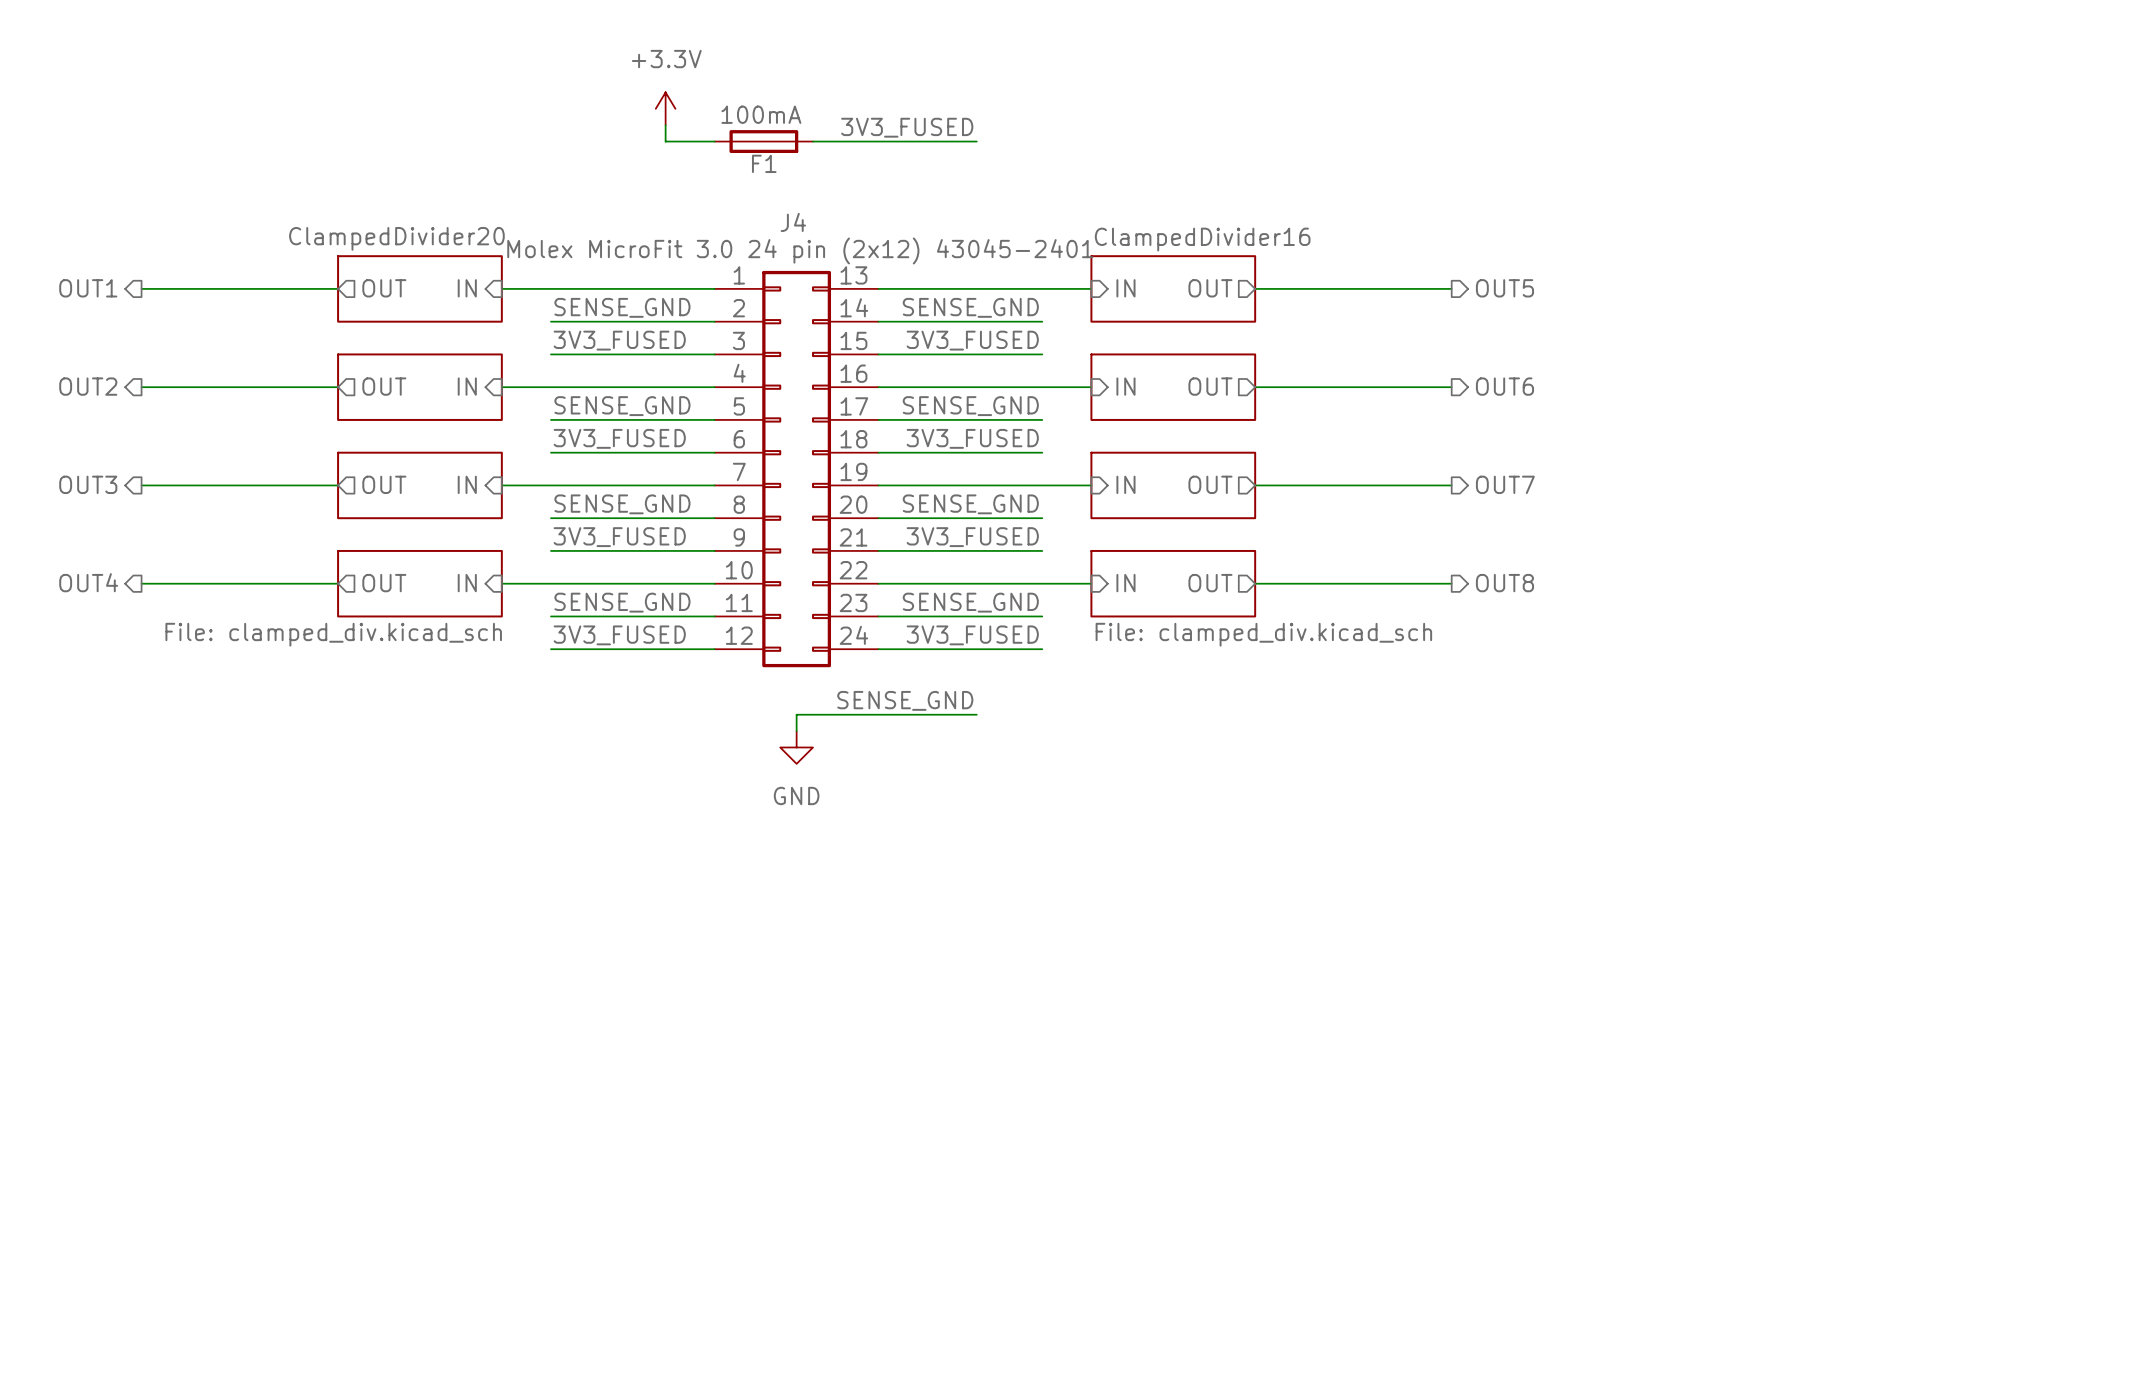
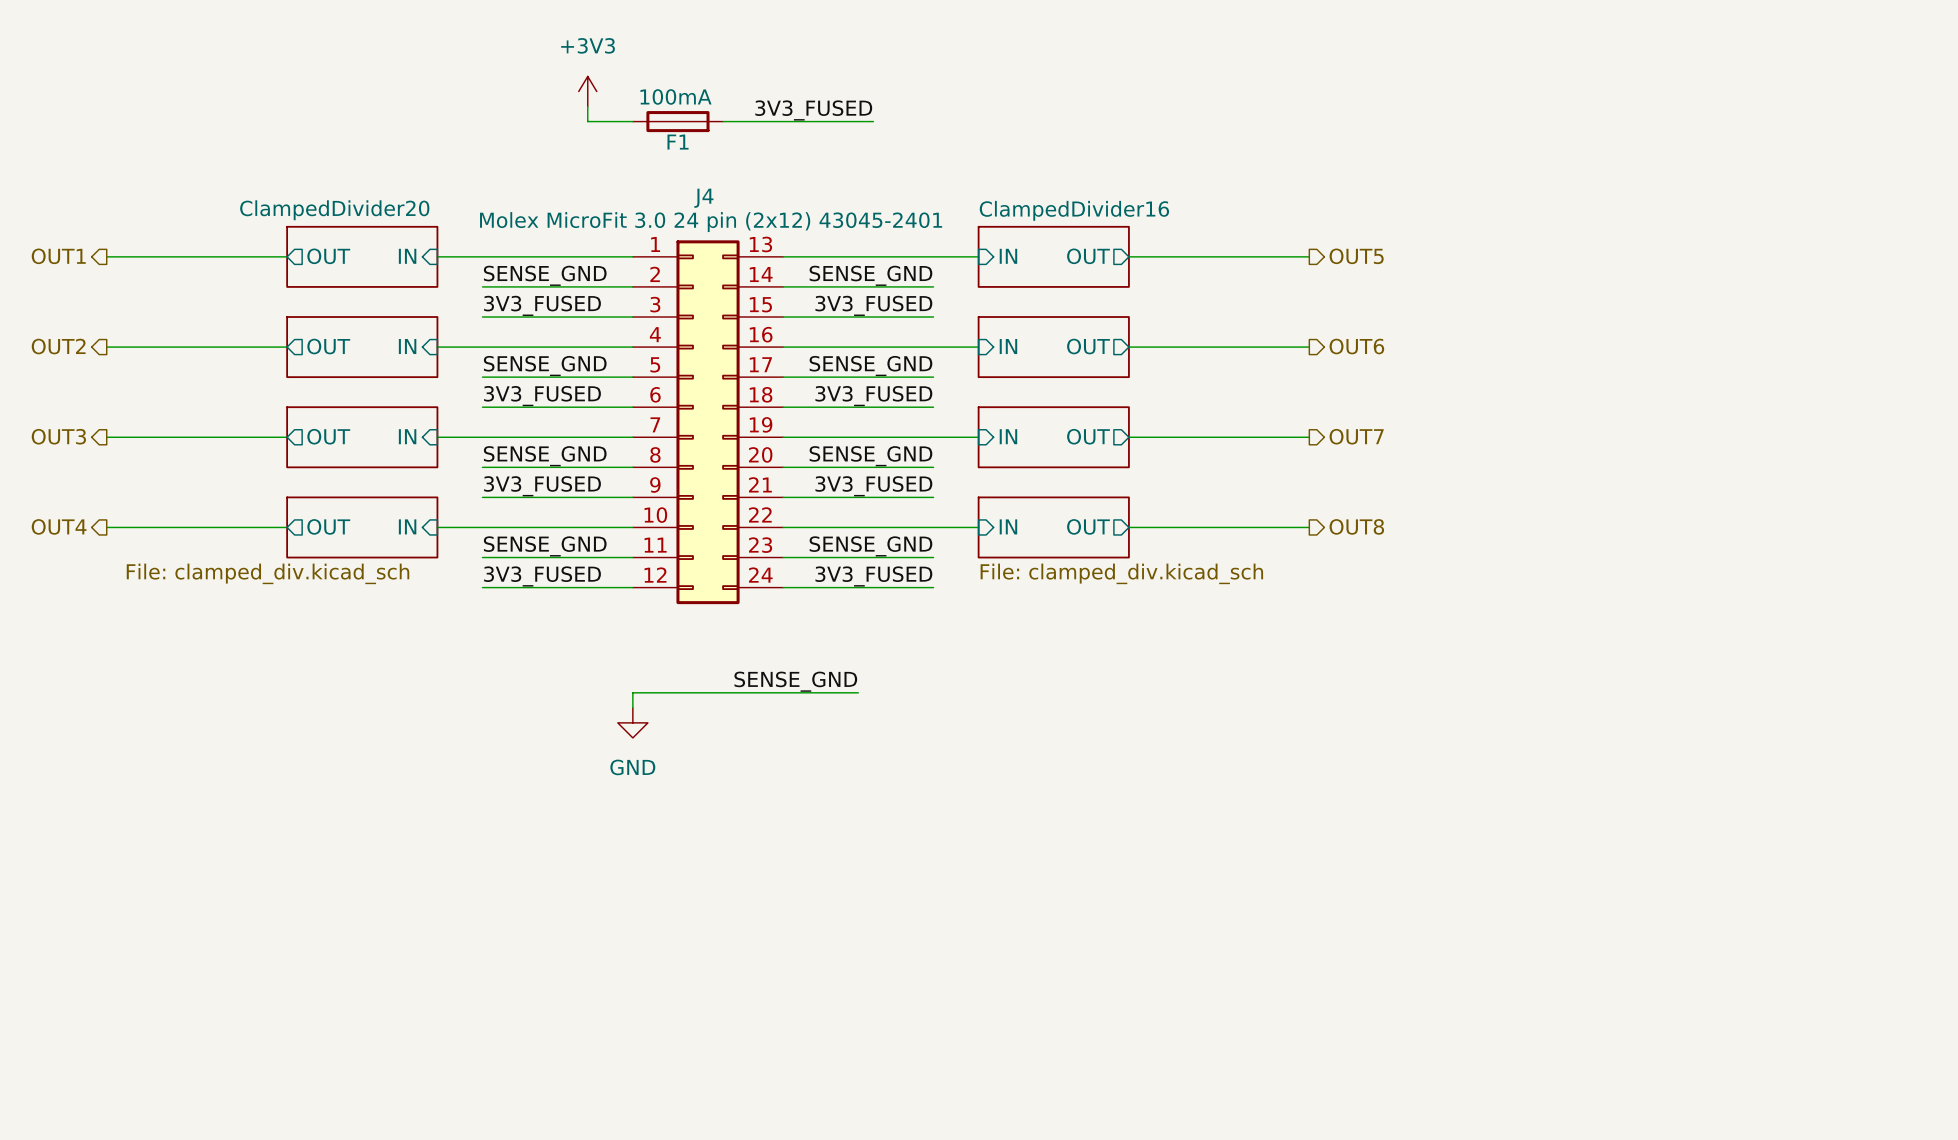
power symbol: +3.3V (665, 108) -> +3V3 (587, 91)
label position: SENSE_GND (905, 700) -> SENSE_GND (795, 681)
wire: (976, 714) (796, 714) (796, 731) -> none
power symbol position: GND (796, 747) -> GND (632, 722)
wire: none -> (858, 692) (632, 692) (632, 707)

